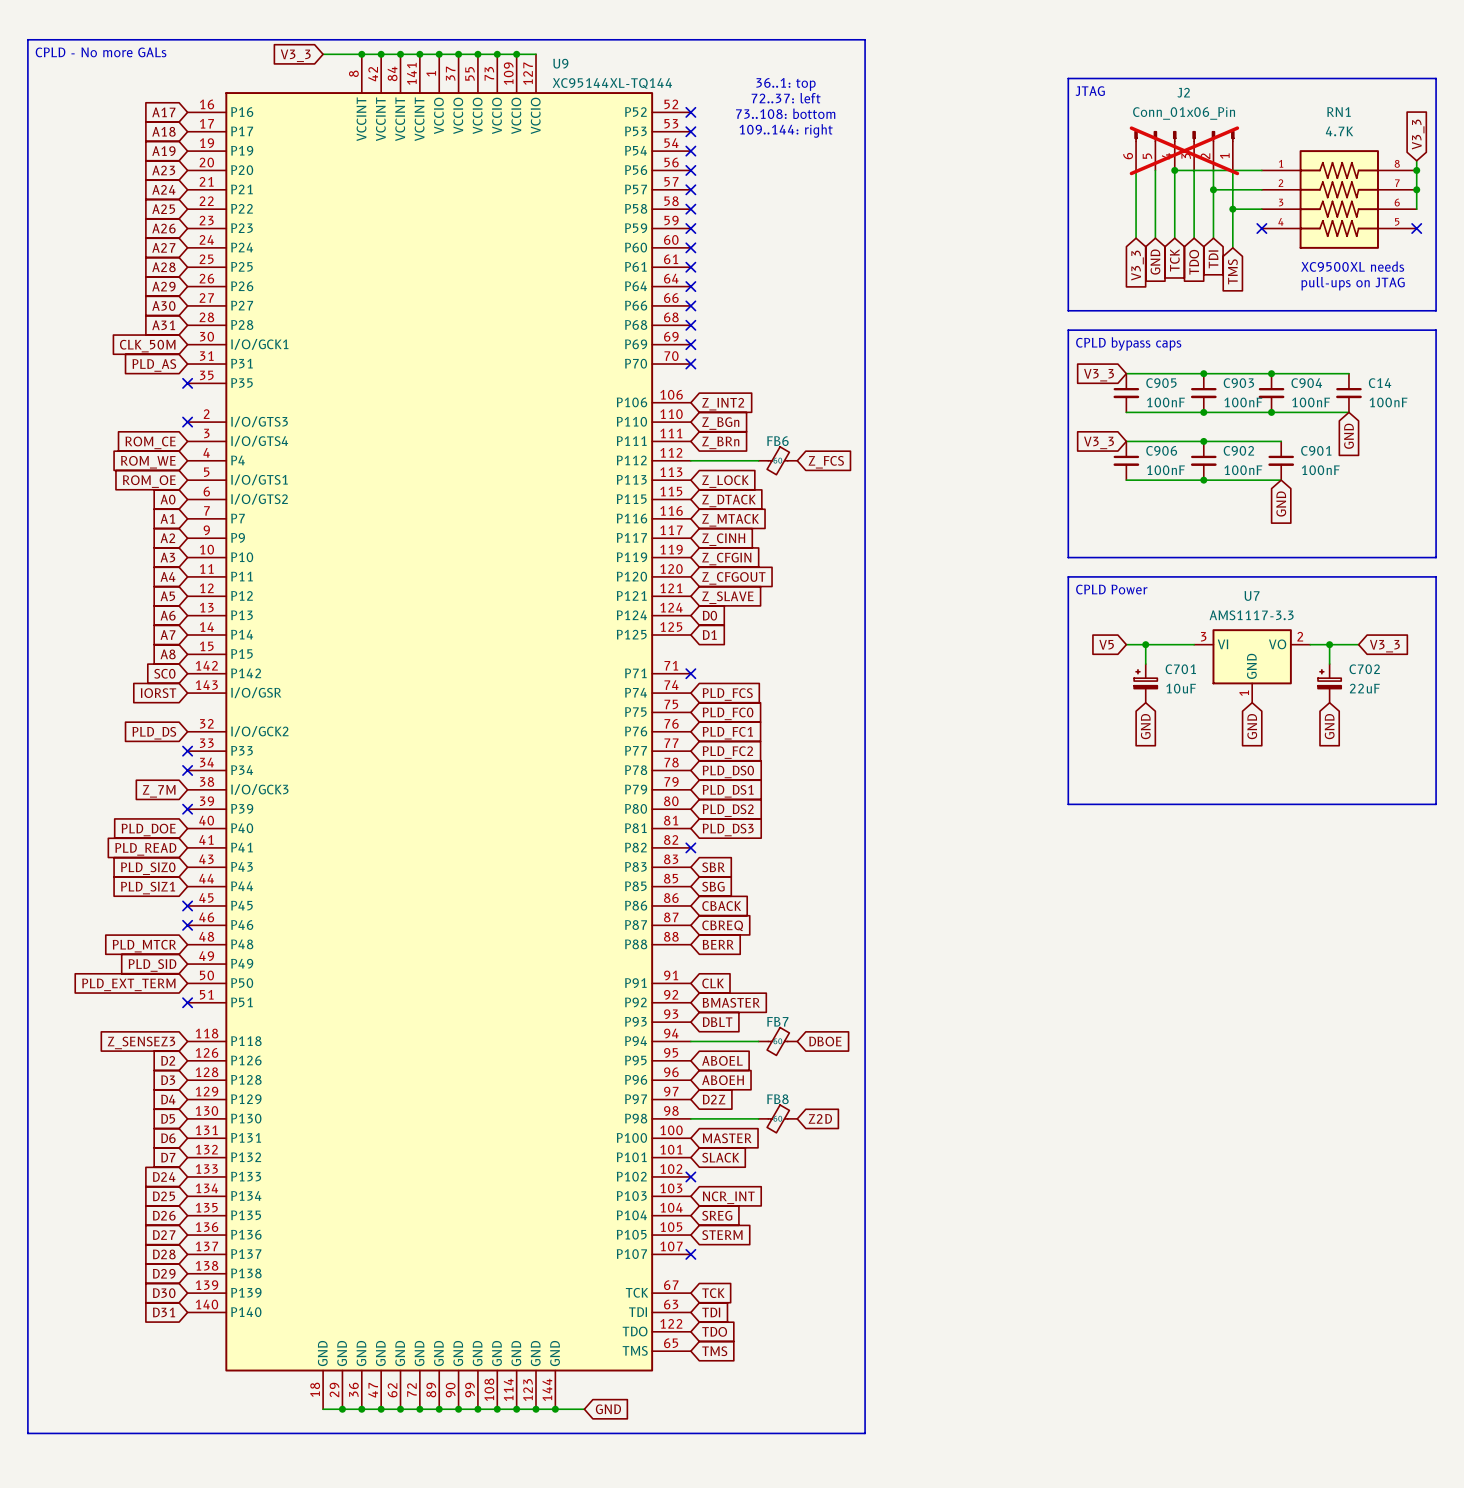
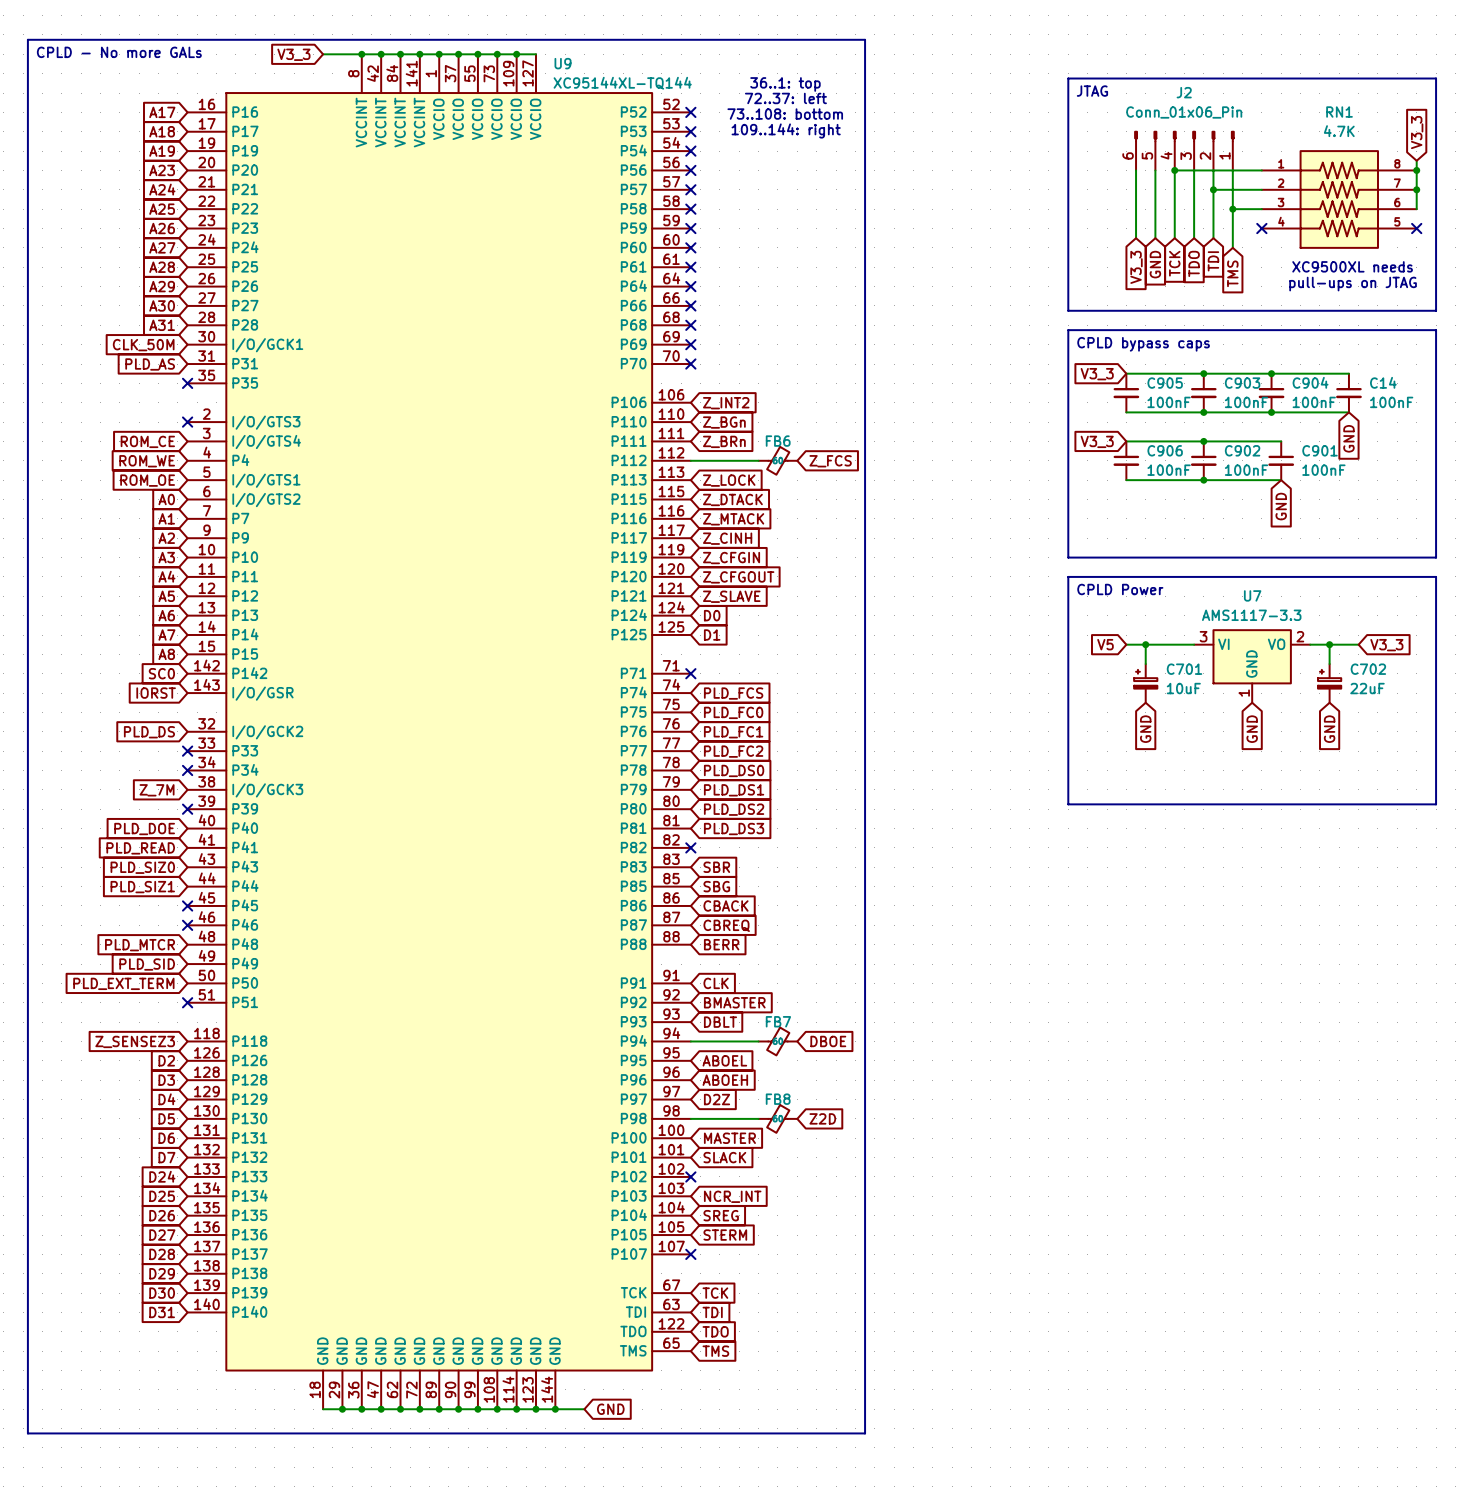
J2 do-not-place cross: (1184, 150) -> none

